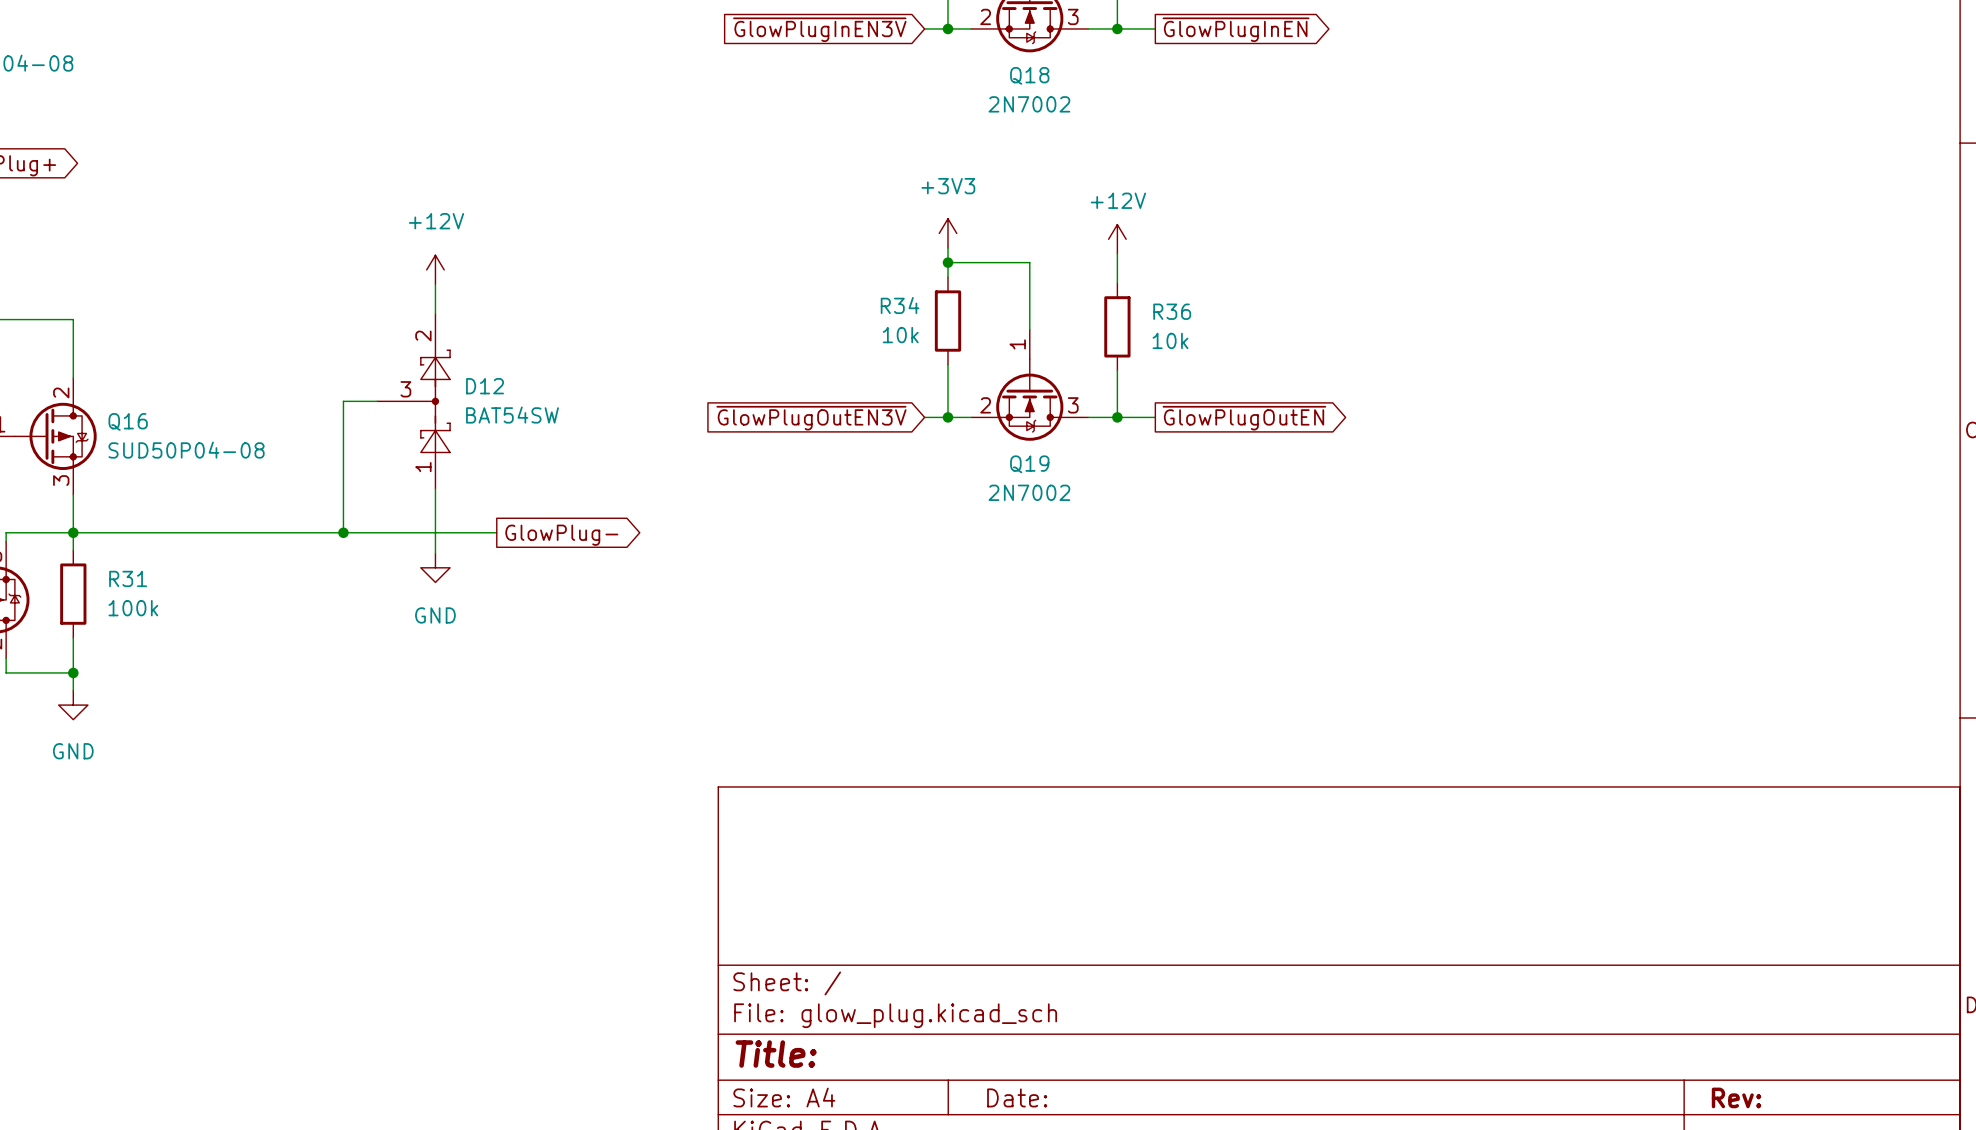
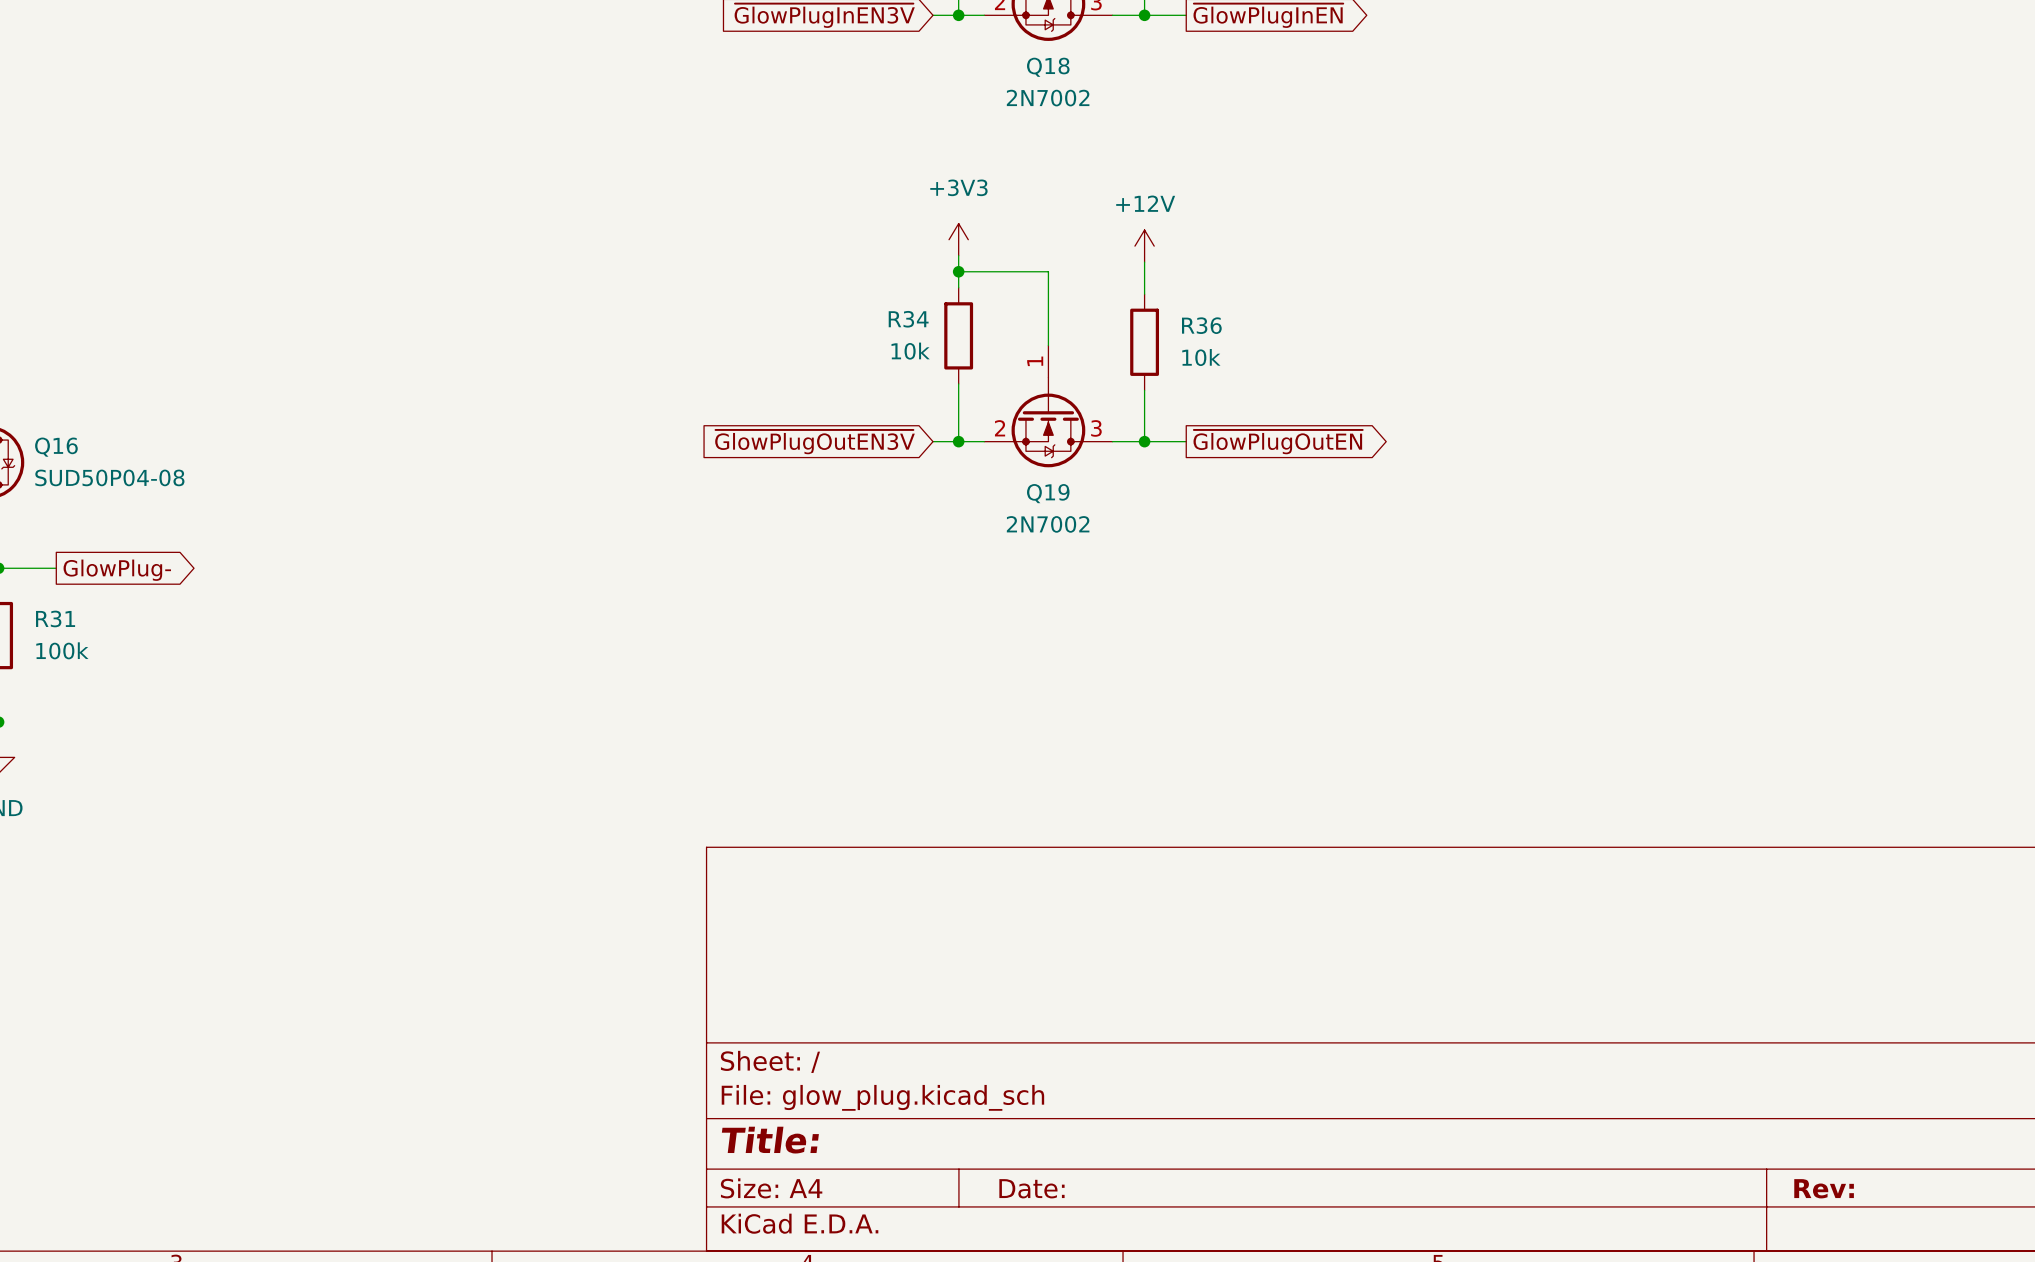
power symbol: +12V (435, 269) -> none
wire: (435, 284) (435, 313) -> none
wire: (377, 401) (343, 401) (343, 532) -> none
D12: BAT54SW (413, 401) -> none
wire: (435, 488) (435, 553) -> none
wire: (125, 532) (496, 532) -> none
junction: (343, 532) -> none
global label: none -> GlowPlug- (117, 570)
global label: GlowPlug- (561, 535) -> none
power symbol: GND (435, 567) -> none

